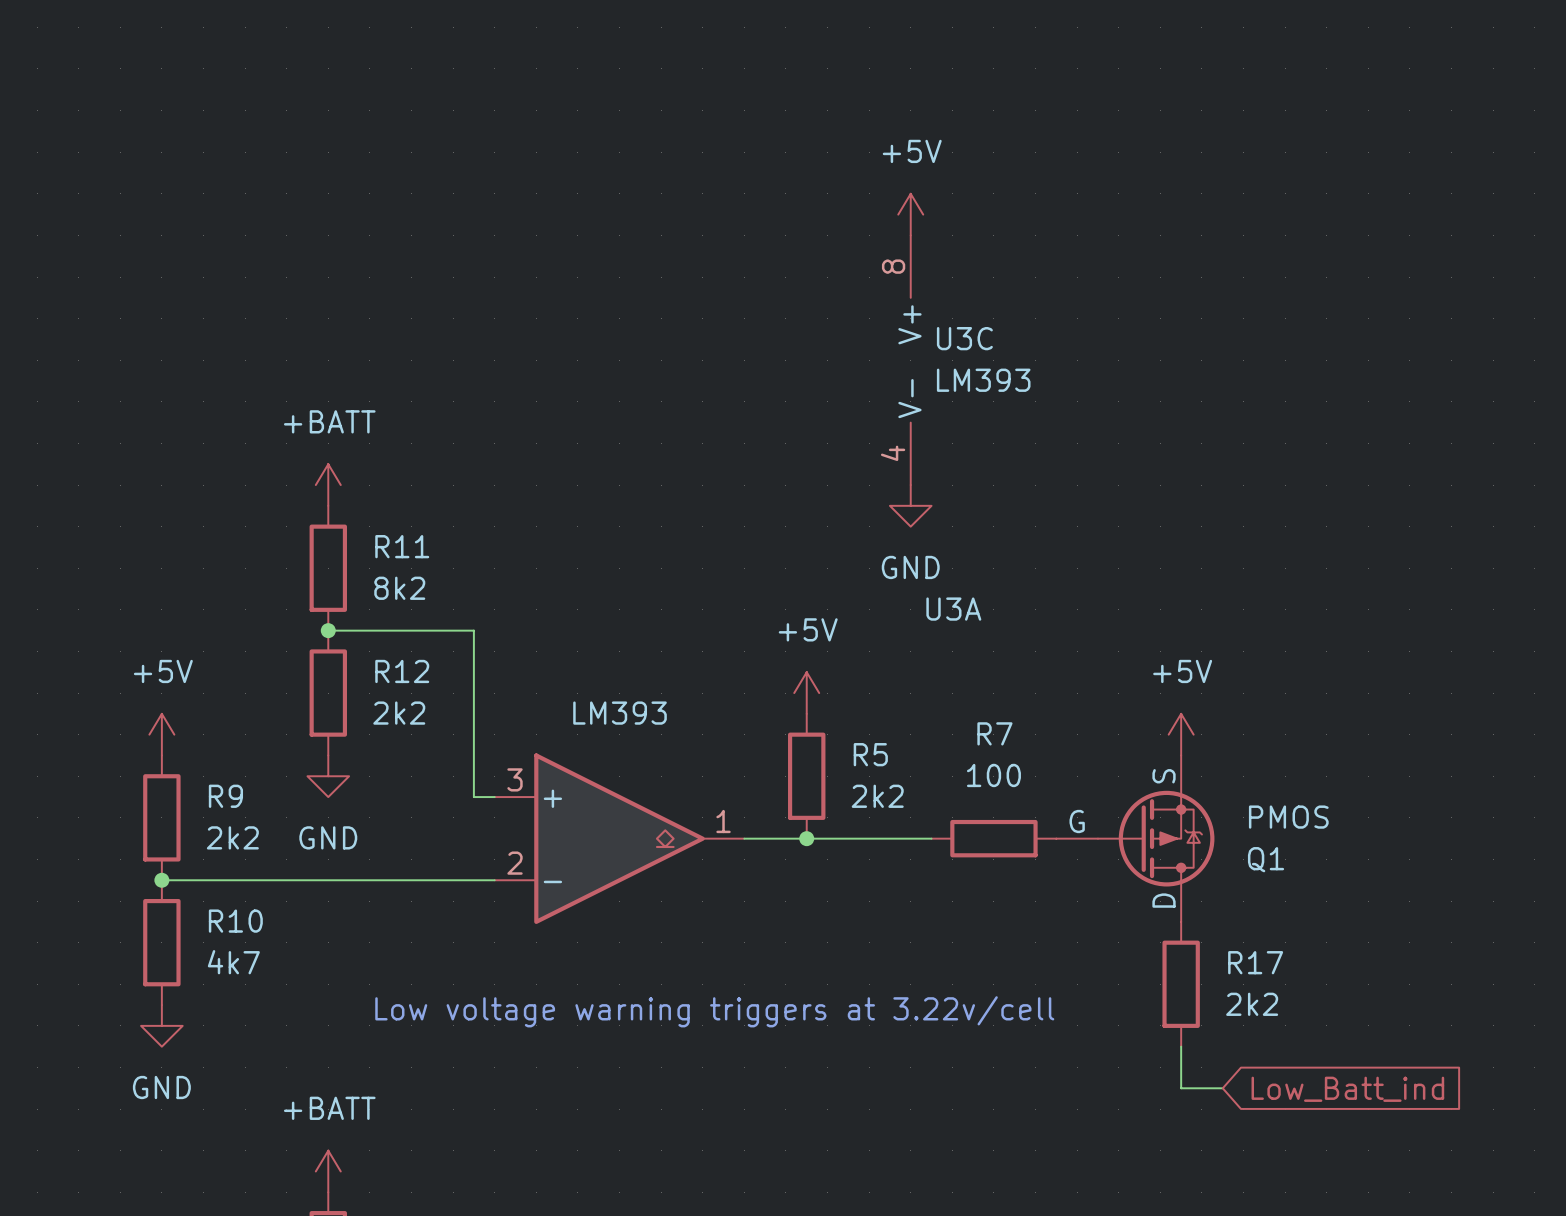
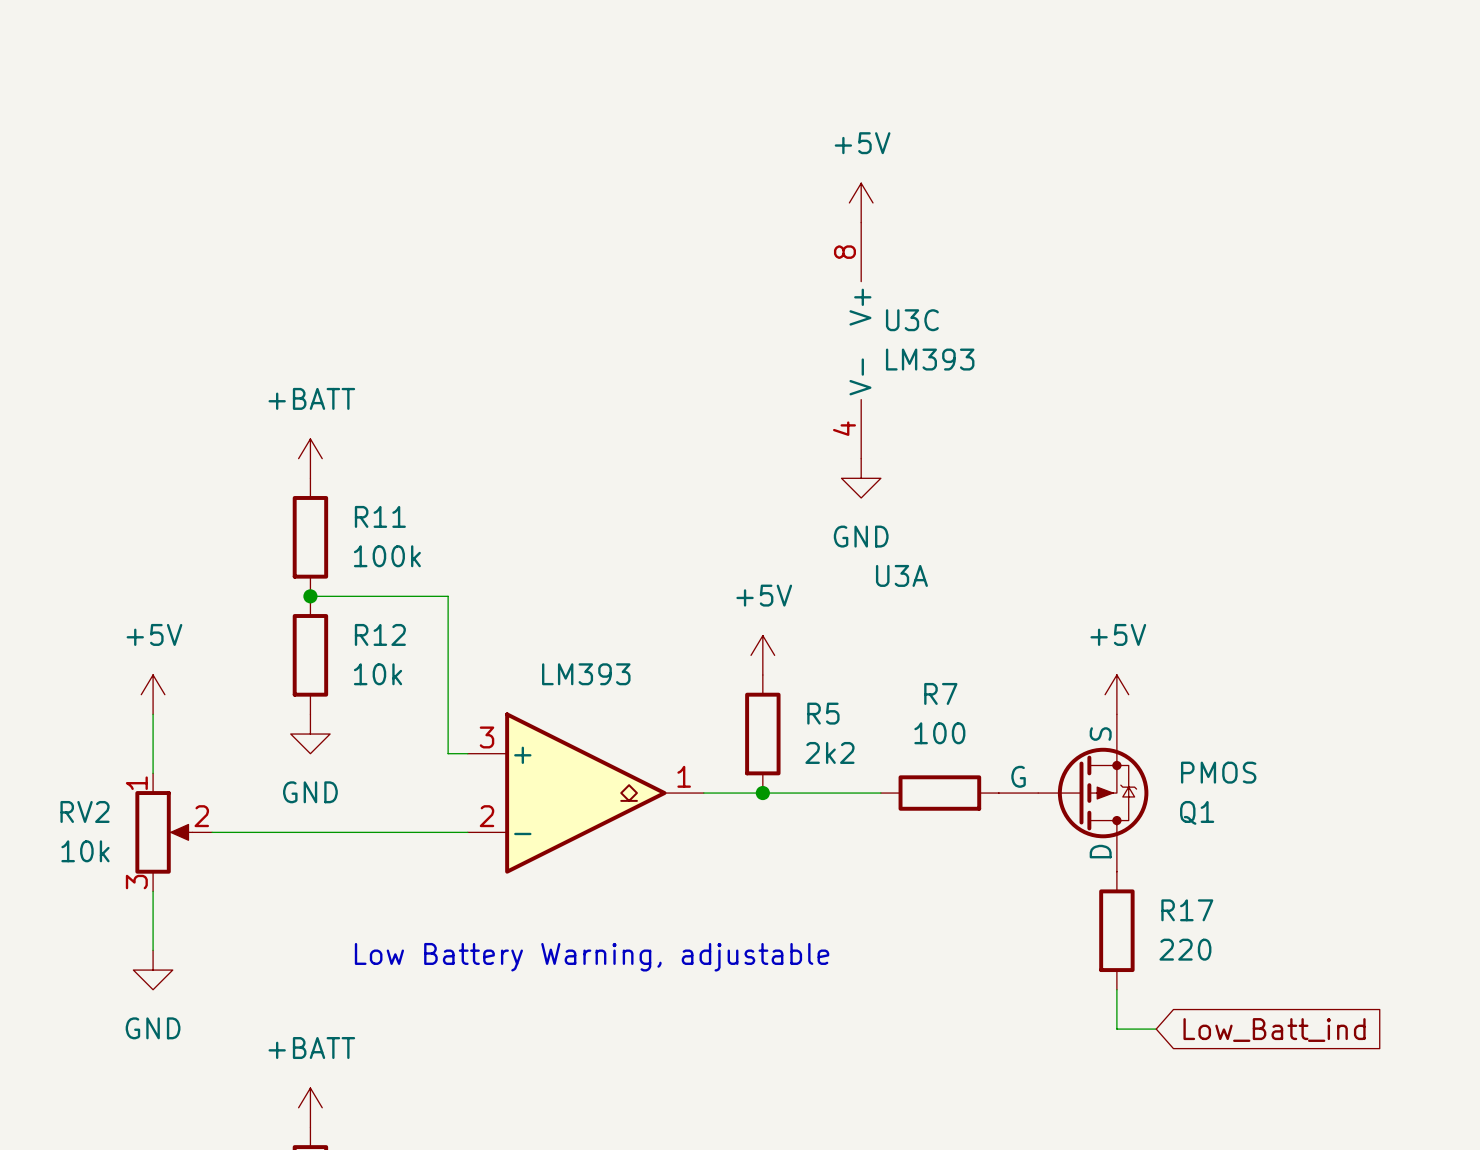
R11 value: 8k2 (399, 588) -> 100k (387, 556)
R12 value: 2k2 (399, 713) -> 10k (378, 674)
wire: none -> (153, 714) (153, 773)
R9: 2k2 (161, 817) -> none
junction: (161, 880) -> none
RV2: none -> 10k (173, 832)
wire: none -> (153, 891) (153, 950)
R10: 4k7 (161, 942) -> none
R17 value: 2k2 (1252, 1004) -> 220 (1185, 949)
text: Low voltage warning triggers at 3.22v/cell (714, 1011) -> Low Battery Warning, adjustable (592, 957)

